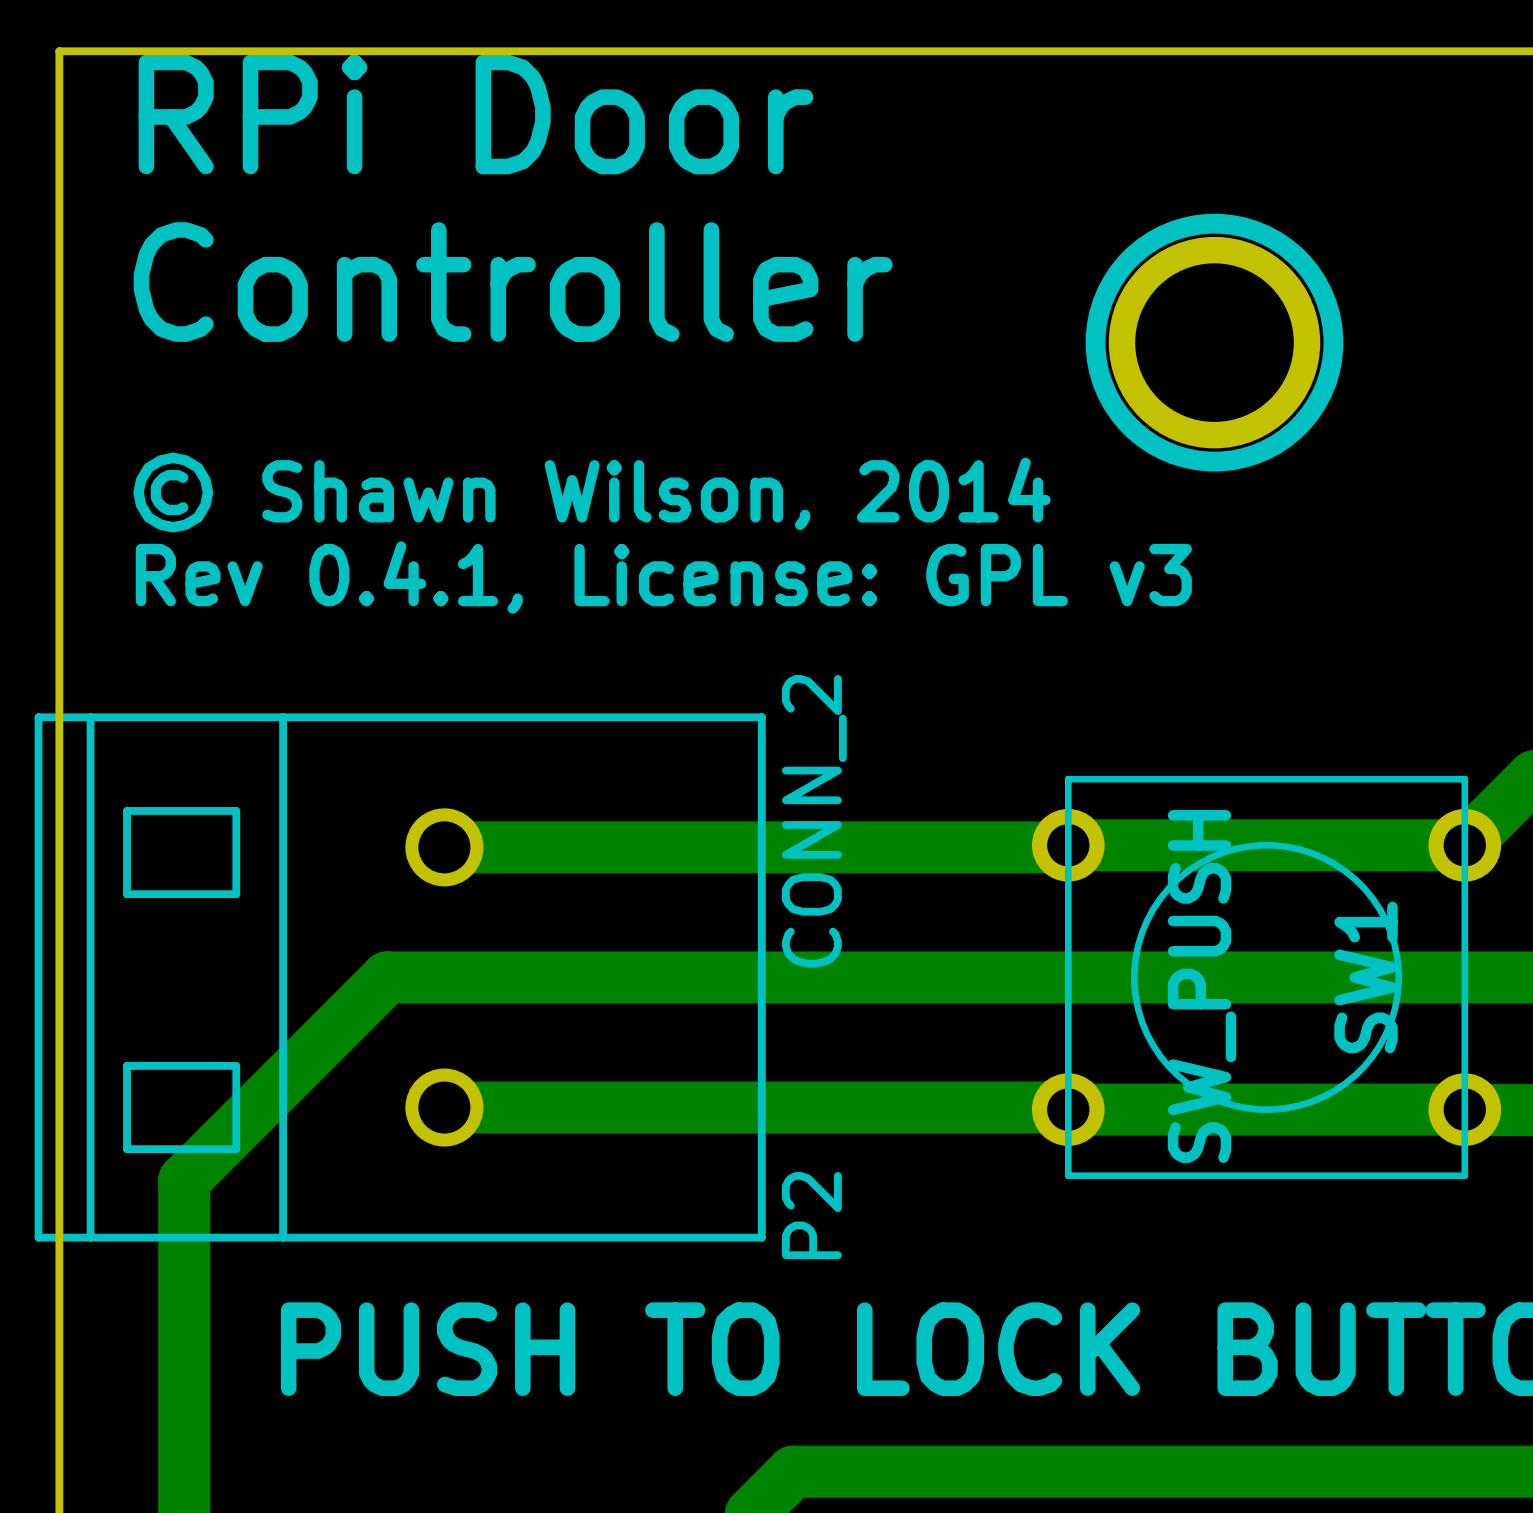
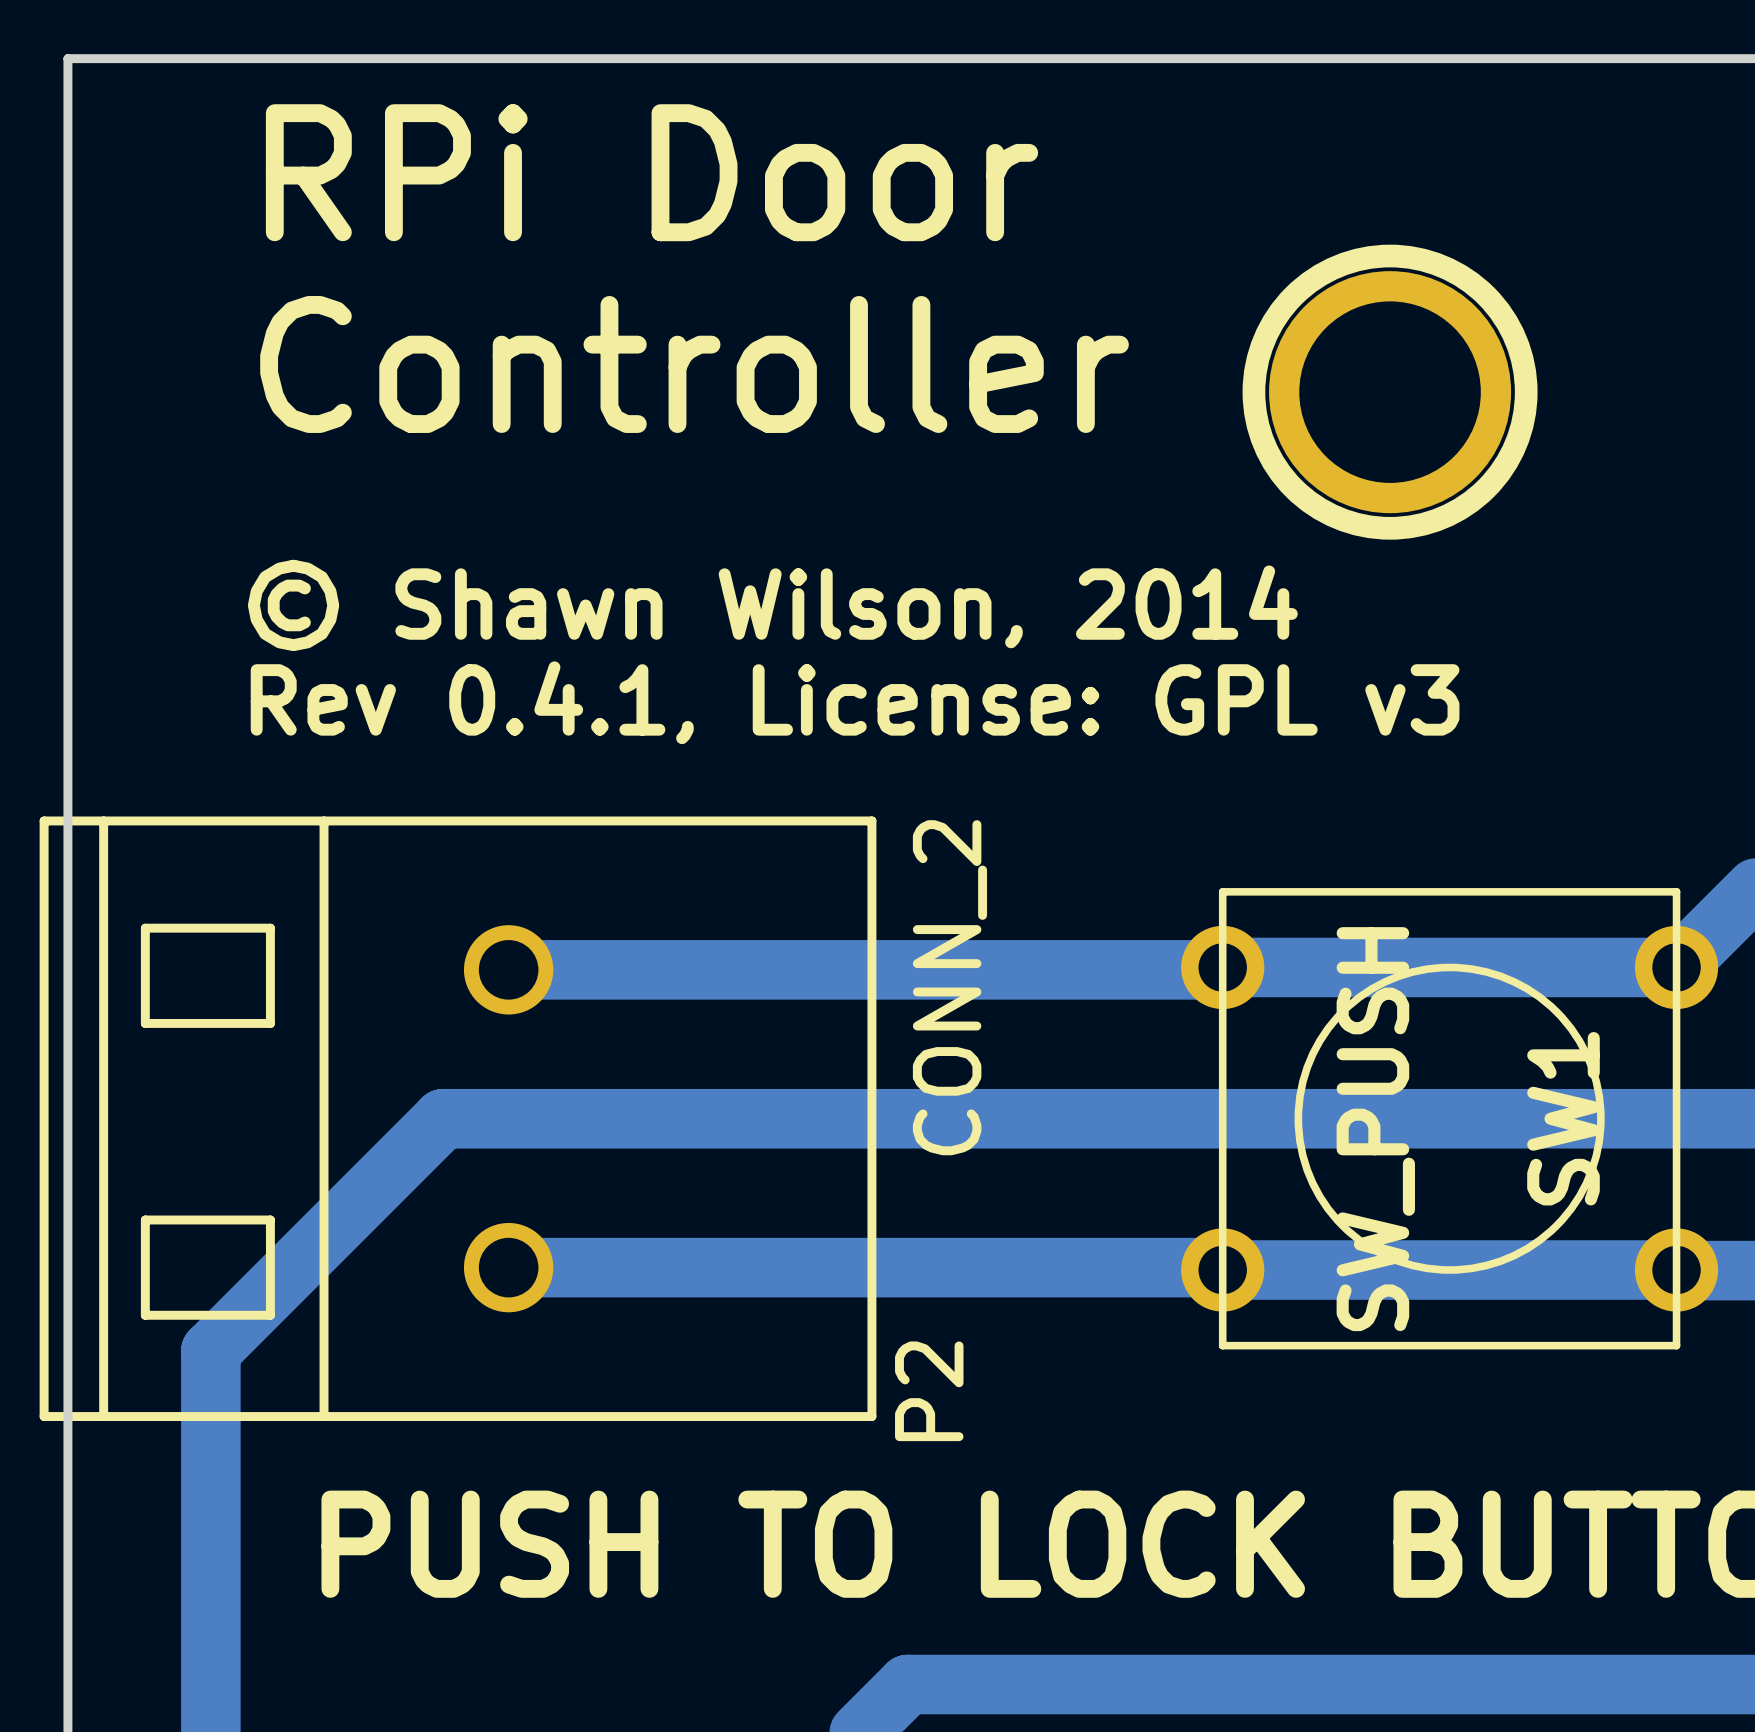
text position: RPi Door (475, 114) -> RPi Door (651, 172)
text position: Controller (513, 282) -> Controller (694, 364)
text position: © Shawn Wilson, 2014 (591, 492) -> © Shawn Wilson, 2014 (772, 605)
text position: Rev 0.4.1, License: GPL v3 (663, 577) -> Rev 0.4.1, License: GPL v3 (855, 702)
P2 value position: CONN_2 (814, 821) -> CONN_2 (949, 987)

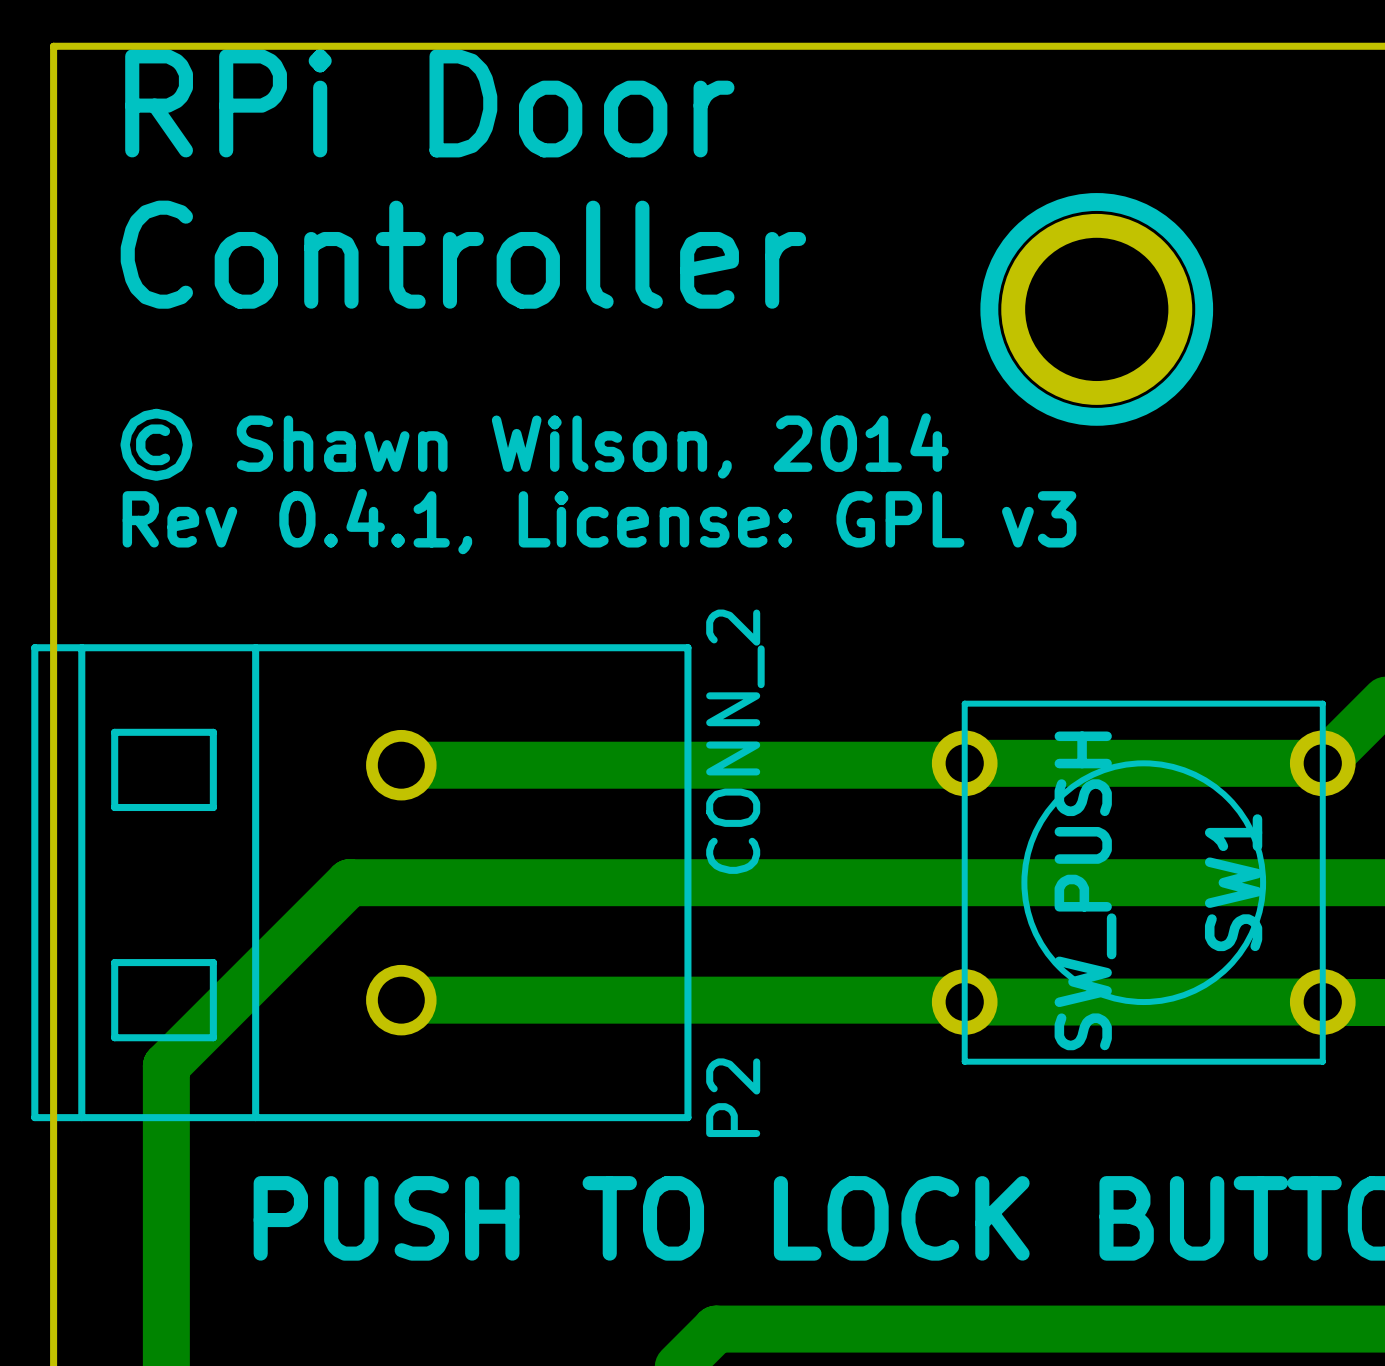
text position: RPi Door (651, 172) -> RPi Door (429, 103)
text position: Controller (694, 364) -> Controller (463, 254)
text position: © Shawn Wilson, 2014 (772, 605) -> © Shawn Wilson, 2014 (534, 444)
text position: Rev 0.4.1, License: GPL v3 (855, 702) -> Rev 0.4.1, License: GPL v3 (599, 521)
P2 value position: CONN_2 (949, 987) -> CONN_2 (735, 741)

